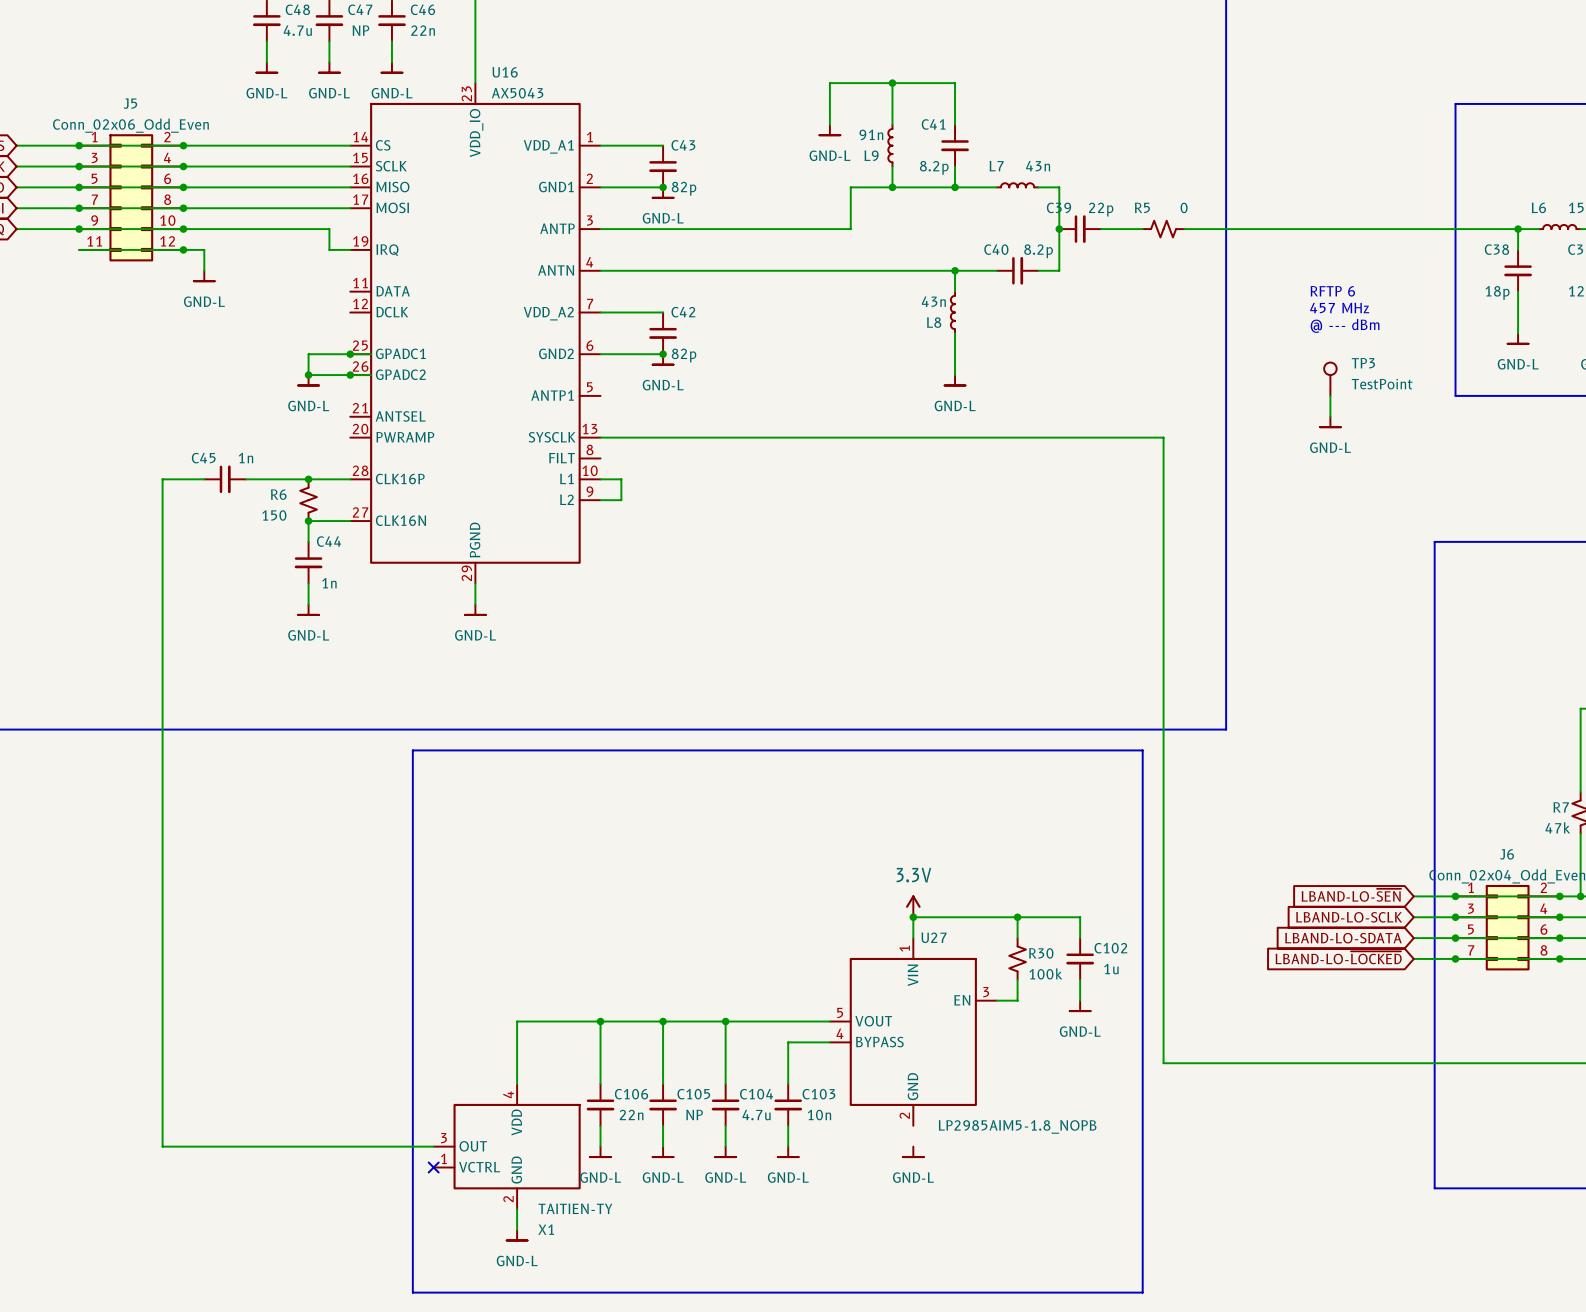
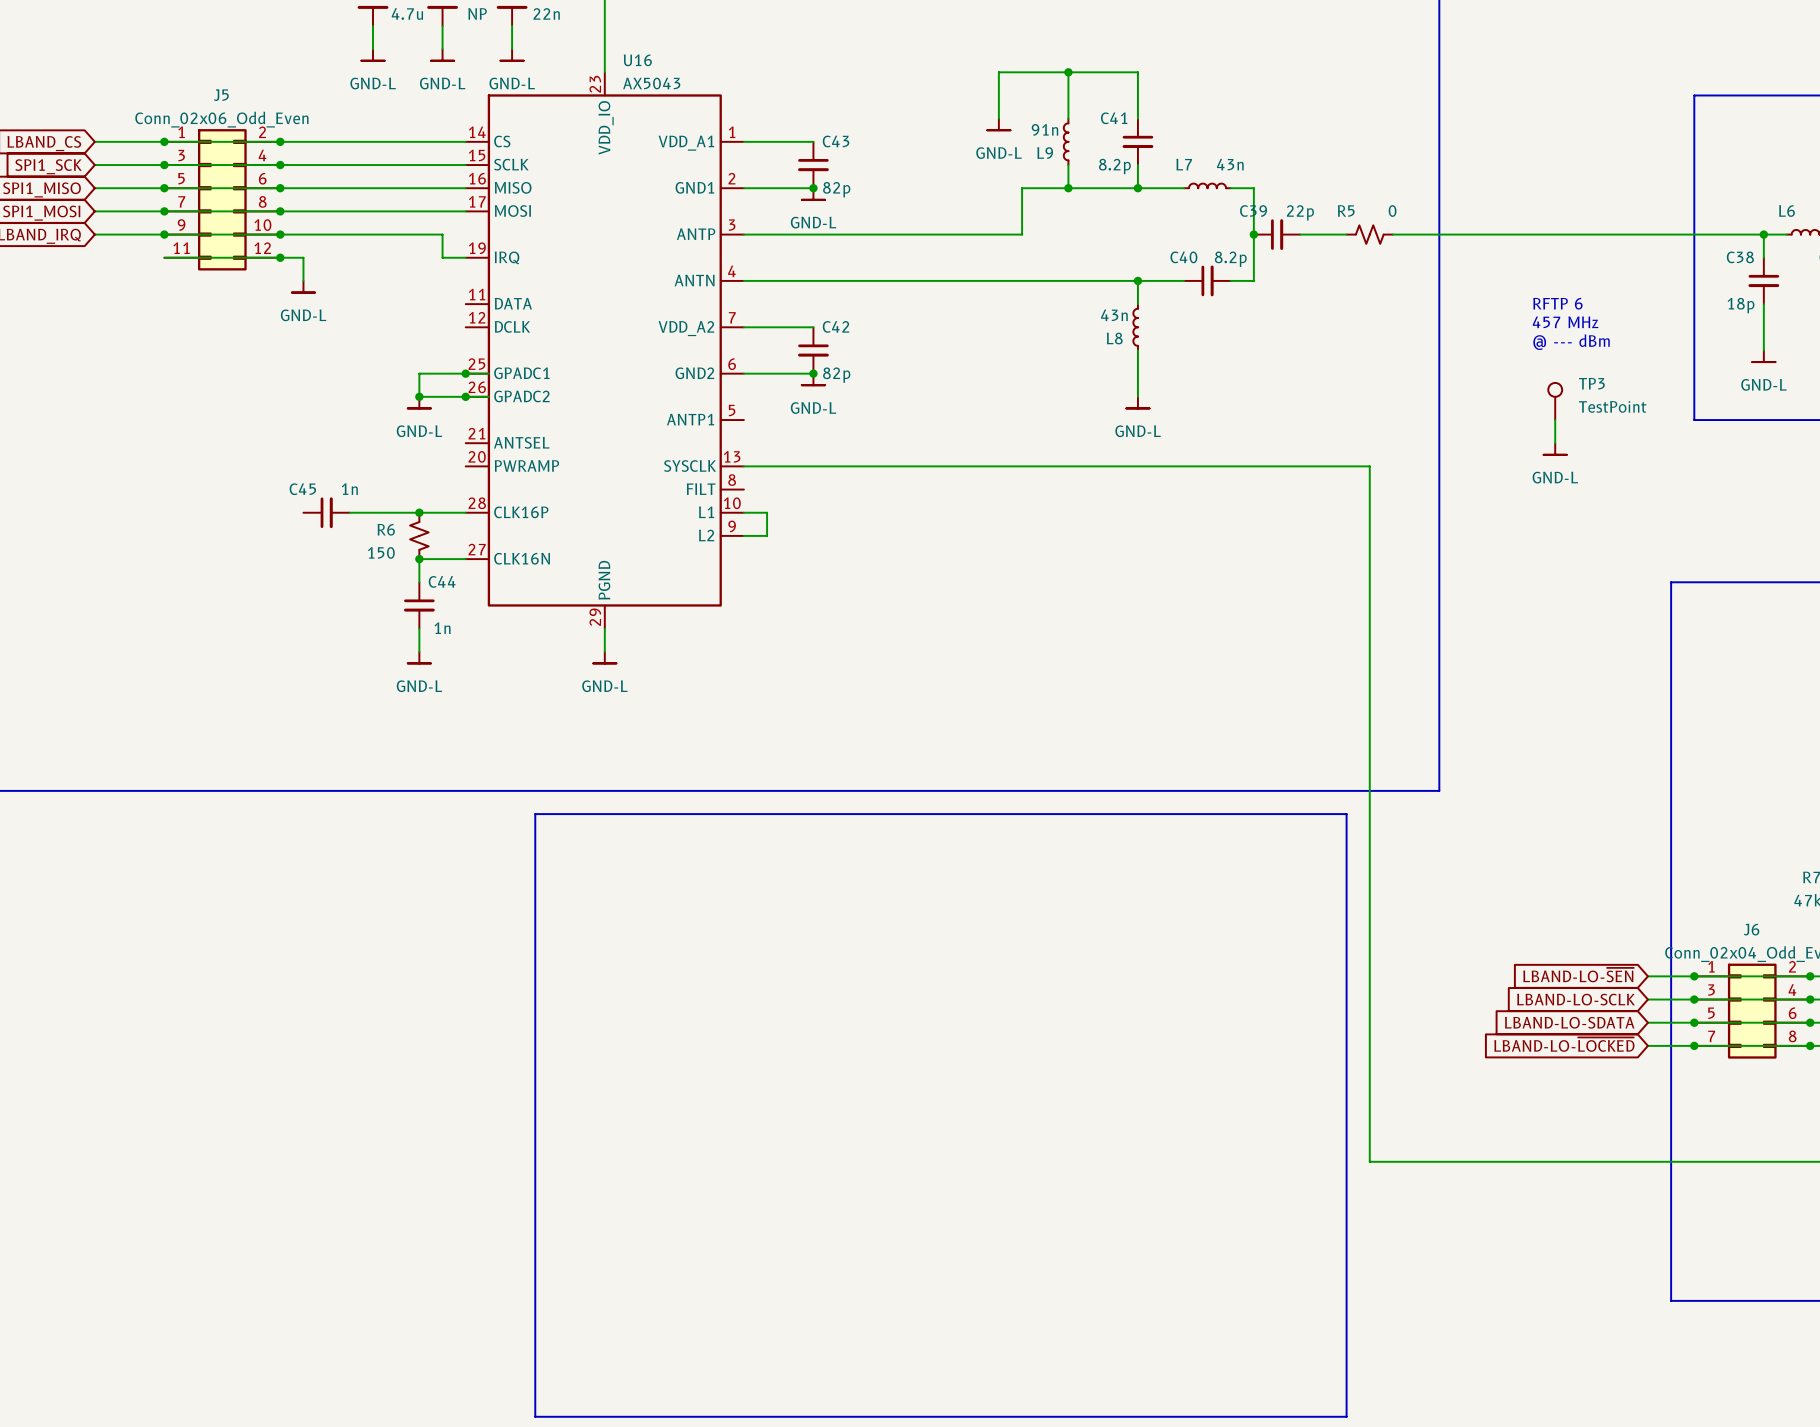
wire: (204, 479) (162, 479) (162, 1146) (433, 1146) -> none
power symbol: 3.3V (913, 906) -> none
junction: (913, 917) -> none
wire: (1017, 917) (1017, 938) -> none
junction: (1017, 917) -> none
wire: (913, 938) (913, 917) (1080, 917) (1080, 938) -> none
R30: 100k (1017, 958) -> none
C102: 1u (1080, 958) -> none
wire: (1017, 979) (1017, 1000) (996, 1000) -> none
wire: (1080, 979) (1080, 1000) -> none
power symbol: GND-L (1080, 1005) -> none
wire: (600, 1021) (600, 1084) -> none
junction: (600, 1021) -> none
wire: (663, 1021) (663, 1084) -> none
junction: (663, 1021) -> none
wire: (725, 1021) (725, 1084) -> none
junction: (725, 1021) -> none
wire: (829, 1021) (517, 1021) (517, 1084) -> none
U27: LP2985AIM5-1.8_NOPB (913, 1031) -> none
wire: (829, 1042) (788, 1042) (788, 1084) -> none
C106: 22n (600, 1104) -> none
C105: NP (663, 1104) -> none
C104: 4.7u (725, 1104) -> none
C103: 10n (788, 1104) -> none
wire: (600, 1125) (600, 1146) -> none
wire: (663, 1125) (663, 1146) -> none
wire: (725, 1125) (725, 1146) -> none
wire: (788, 1125) (788, 1146) -> none
X1: TAITIEN-TY (507, 1146) -> none
power symbol: GND-L (600, 1151) -> none
power symbol: GND-L (663, 1151) -> none
power symbol: GND-L (725, 1151) -> none
power symbol: GND-L (788, 1151) -> none
power symbol: GND-L (913, 1151) -> none
no-connect mark: (433, 1167) -> none
wire: (517, 1209) (517, 1230) -> none
power symbol: GND-L (517, 1235) -> none

